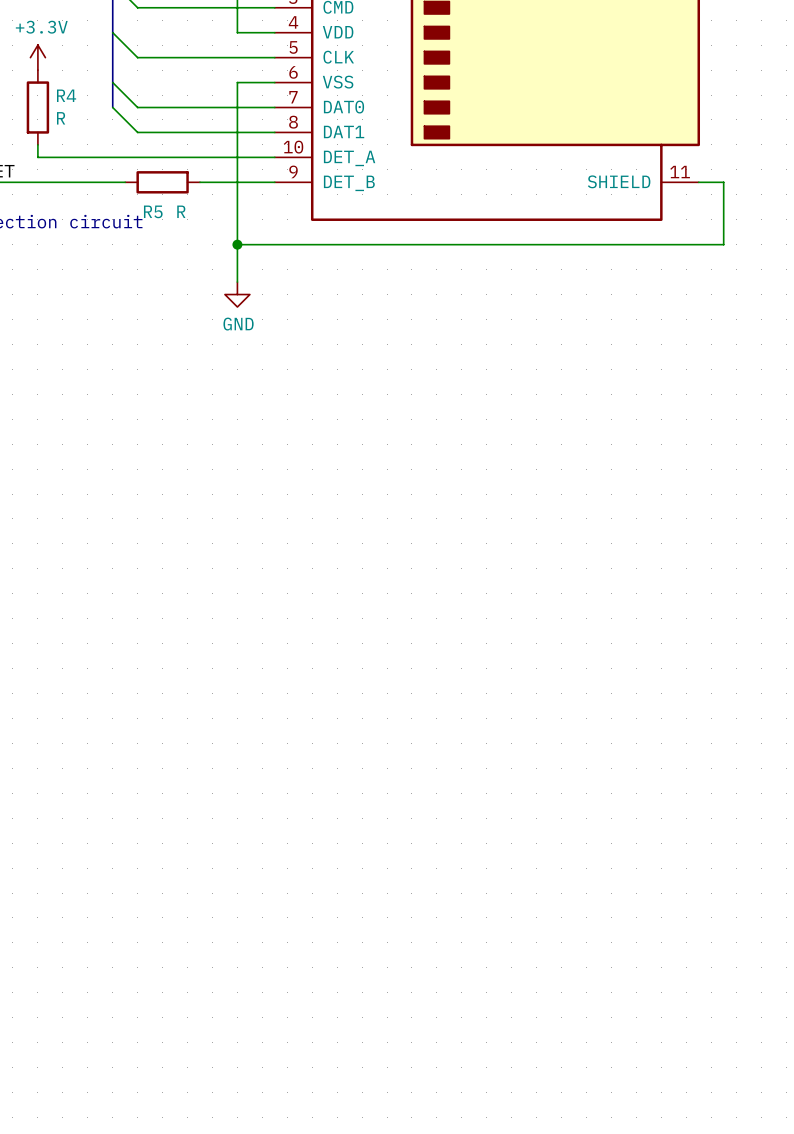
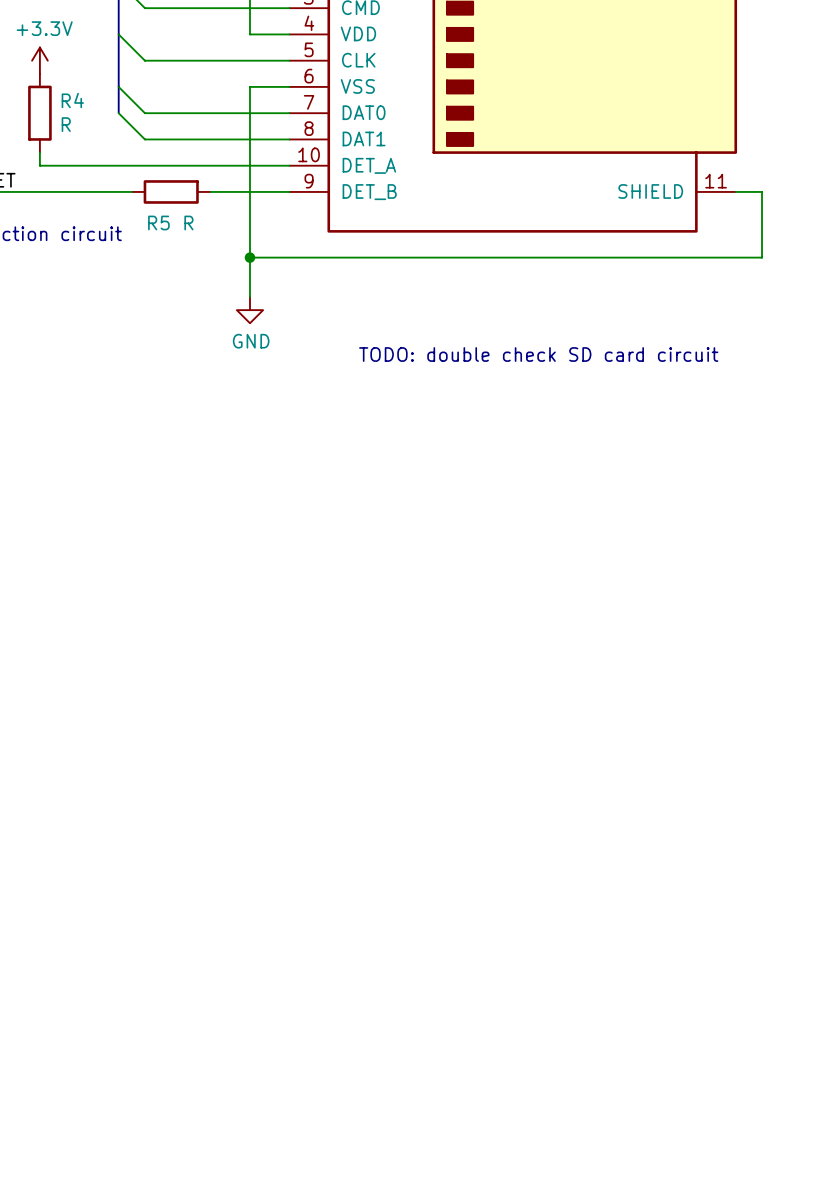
text: none -> TODO: double check SD card circuit (538, 354)

